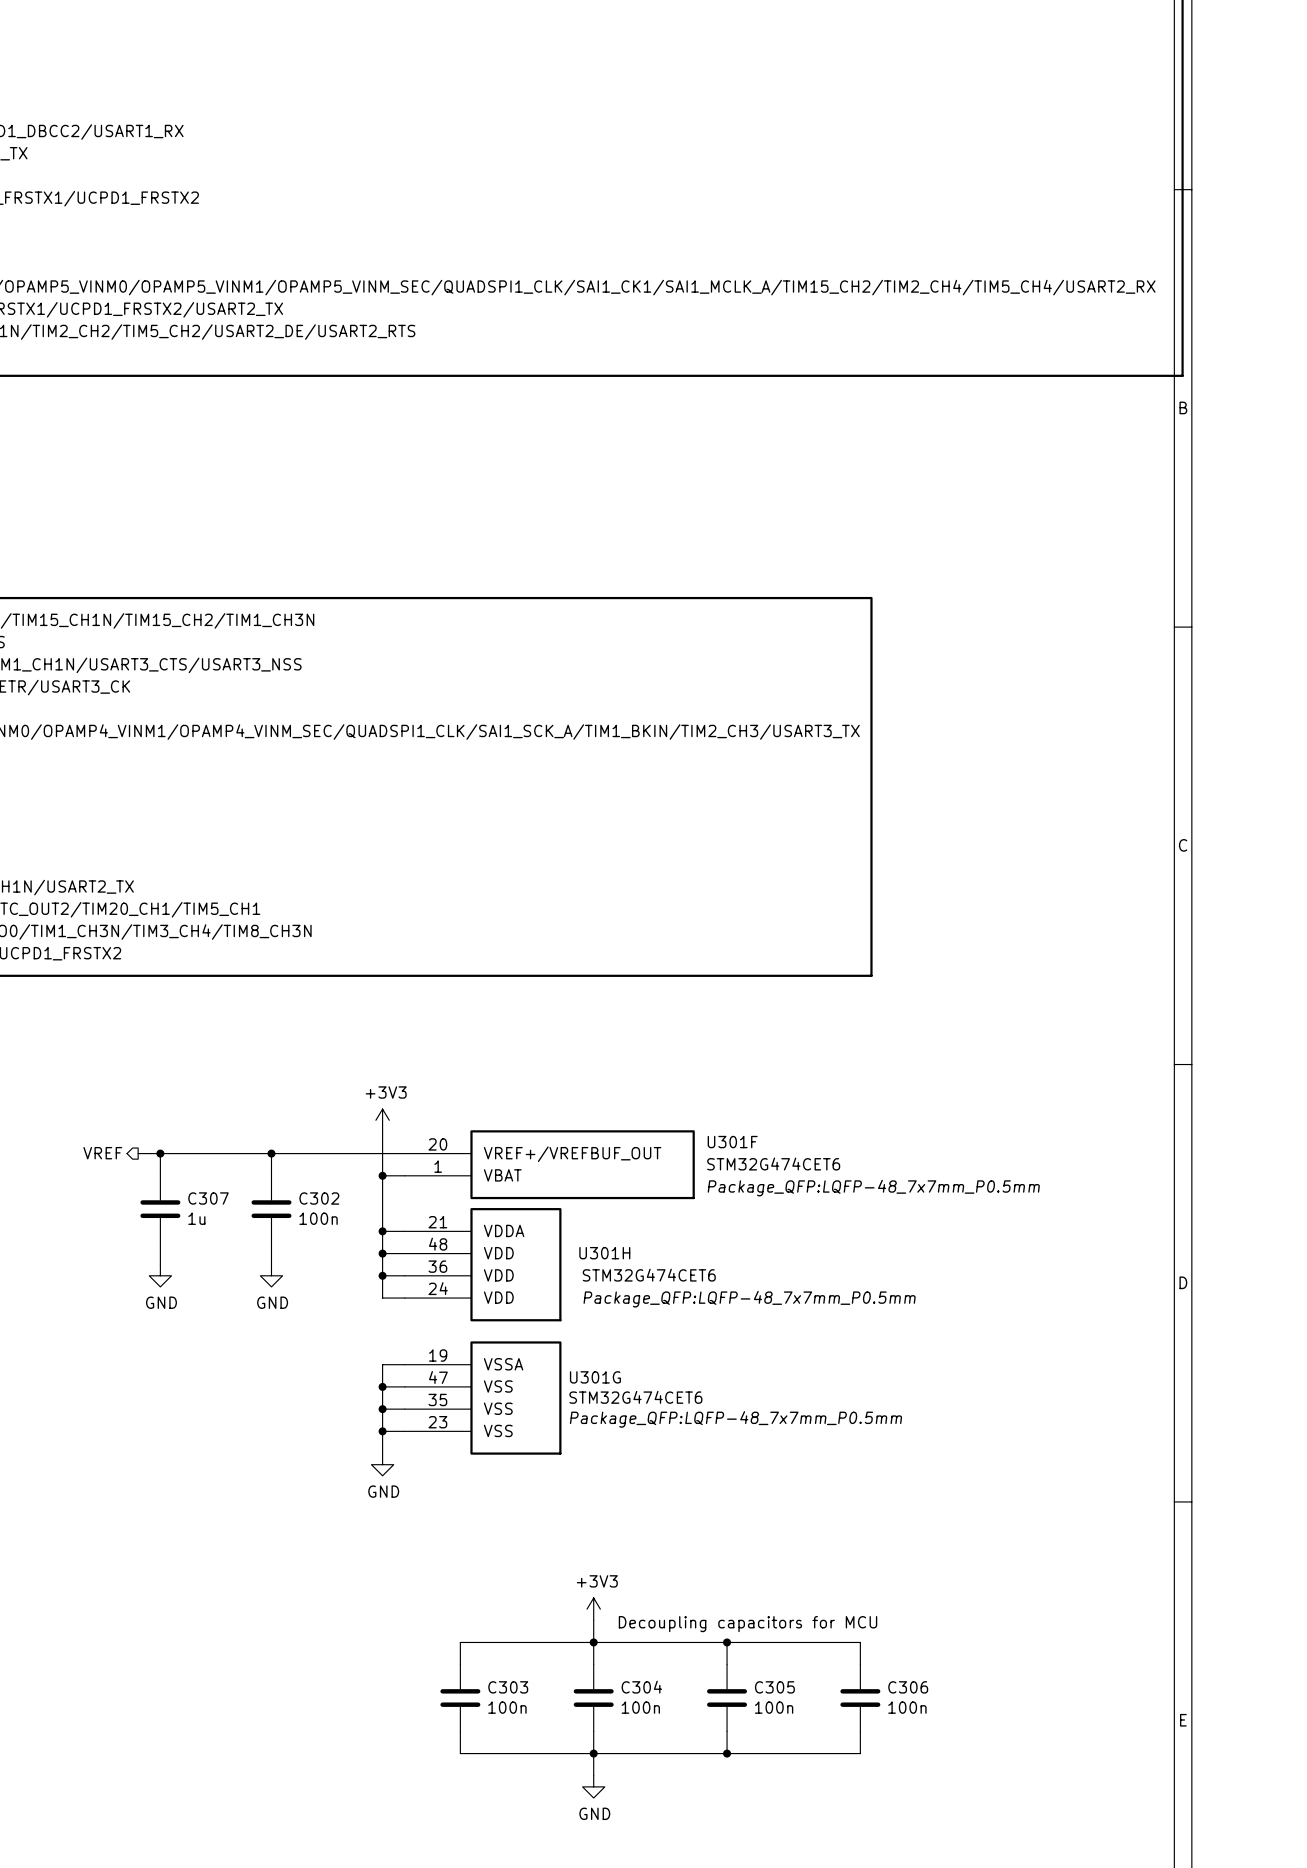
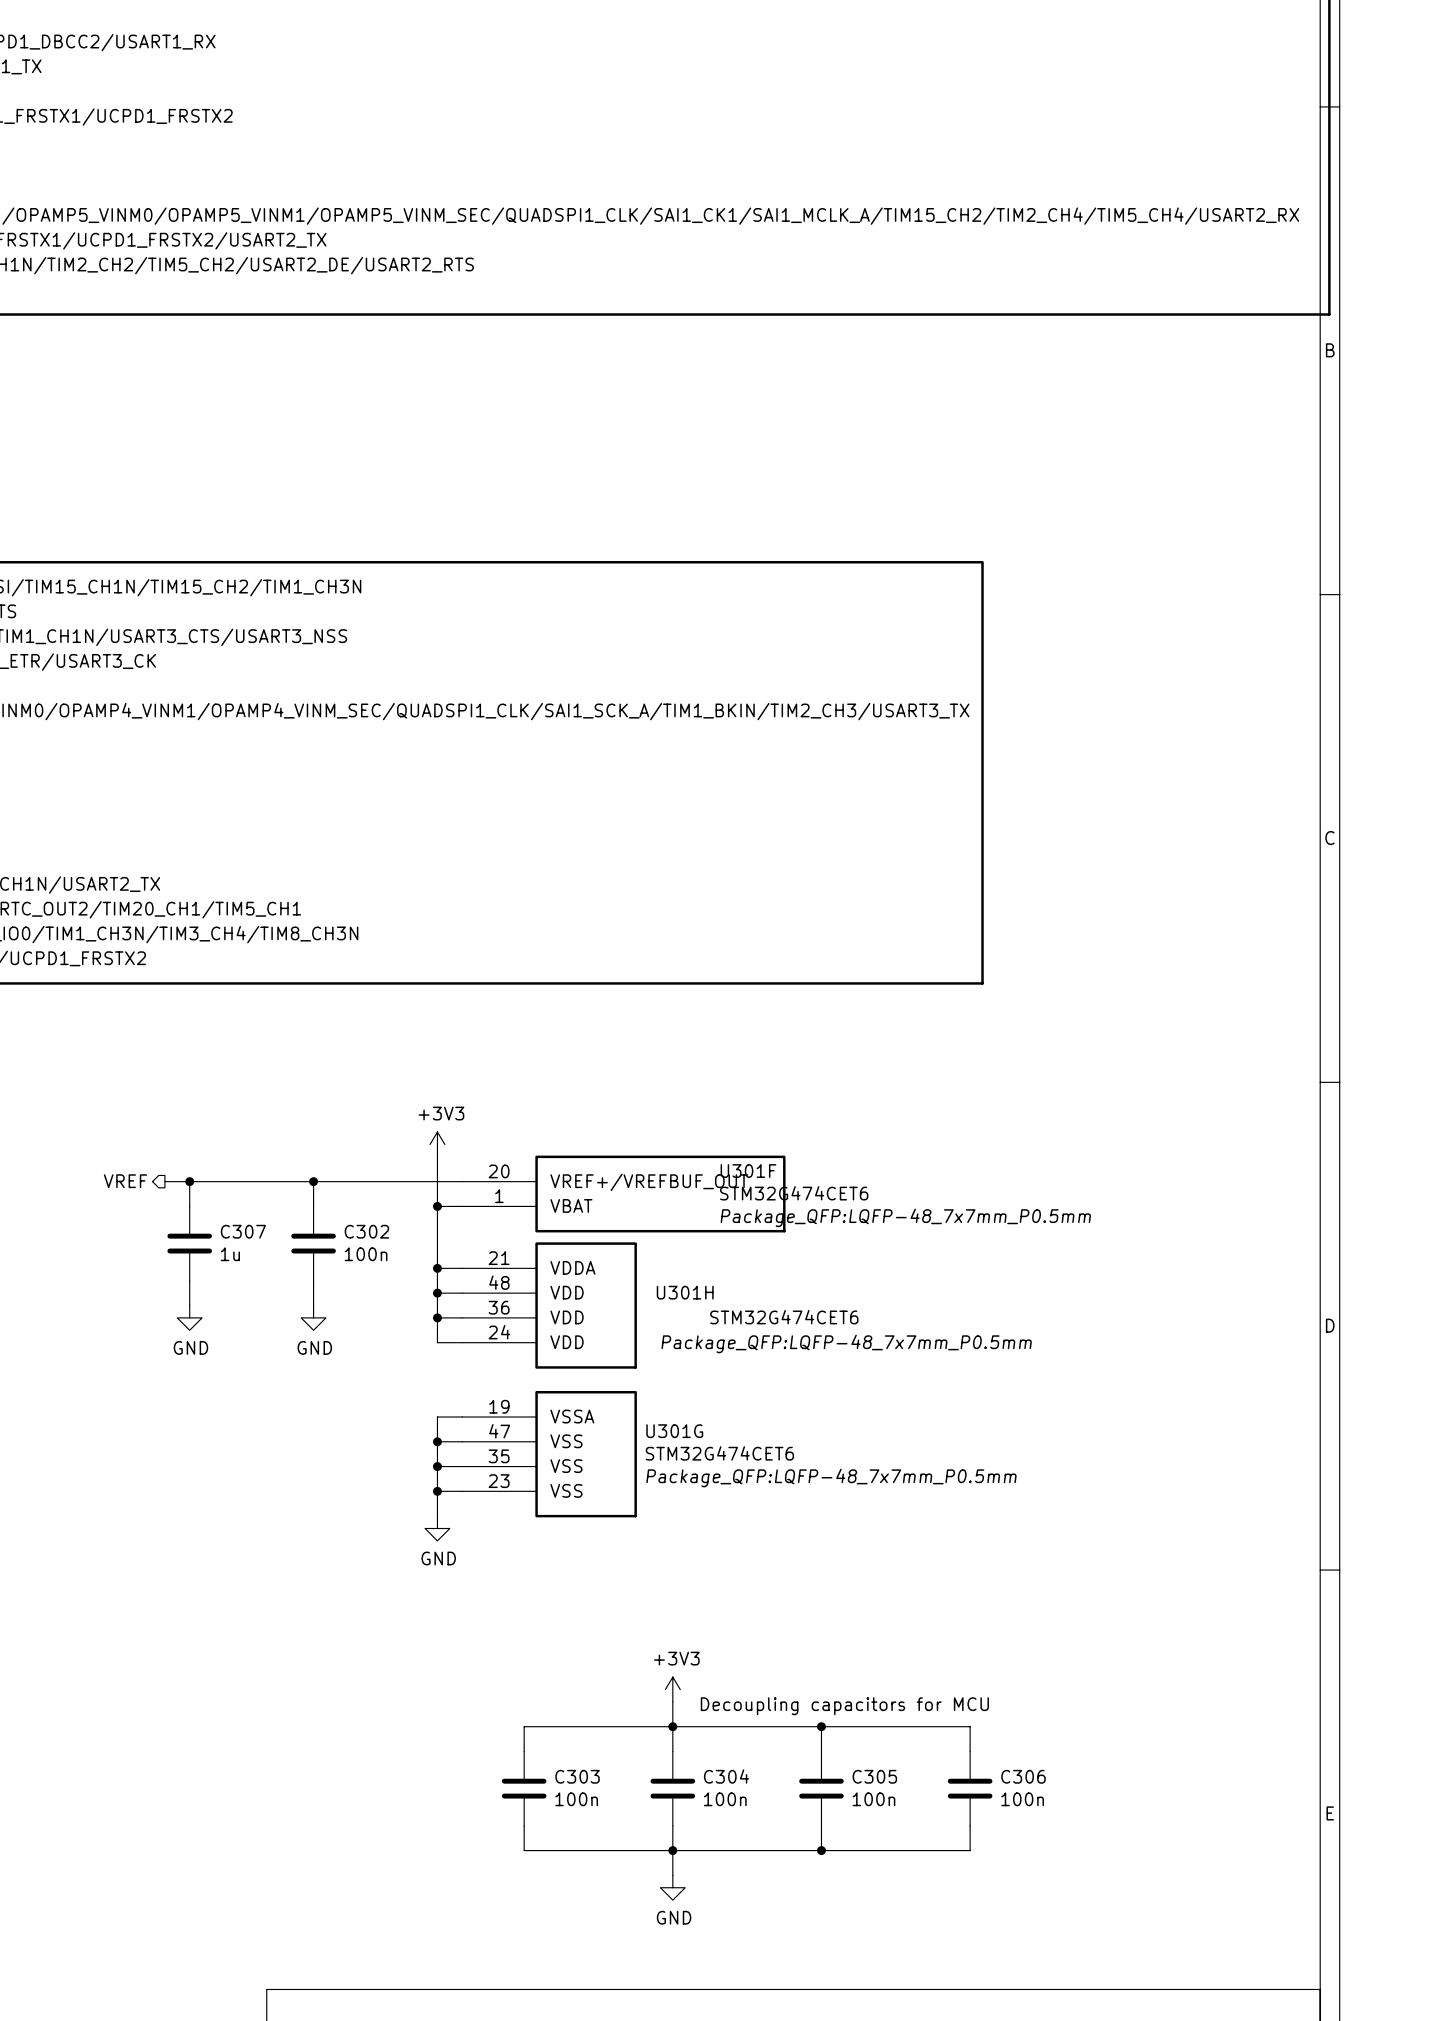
U301F name position: U301F (732, 1142) -> U301F (748, 1171)
U301F value position: STM32G474CET6 (773, 1164) -> STM32G474CET6 (794, 1193)
U301F text position: Package_QFP:LQFP-48_7x7mm_P0.5mm (873, 1188) -> Package_QFP:LQFP-48_7x7mm_P0.5mm (905, 1217)
U301H value position: STM32G474CET6 (649, 1275) -> STM32G474CET6 (784, 1317)

